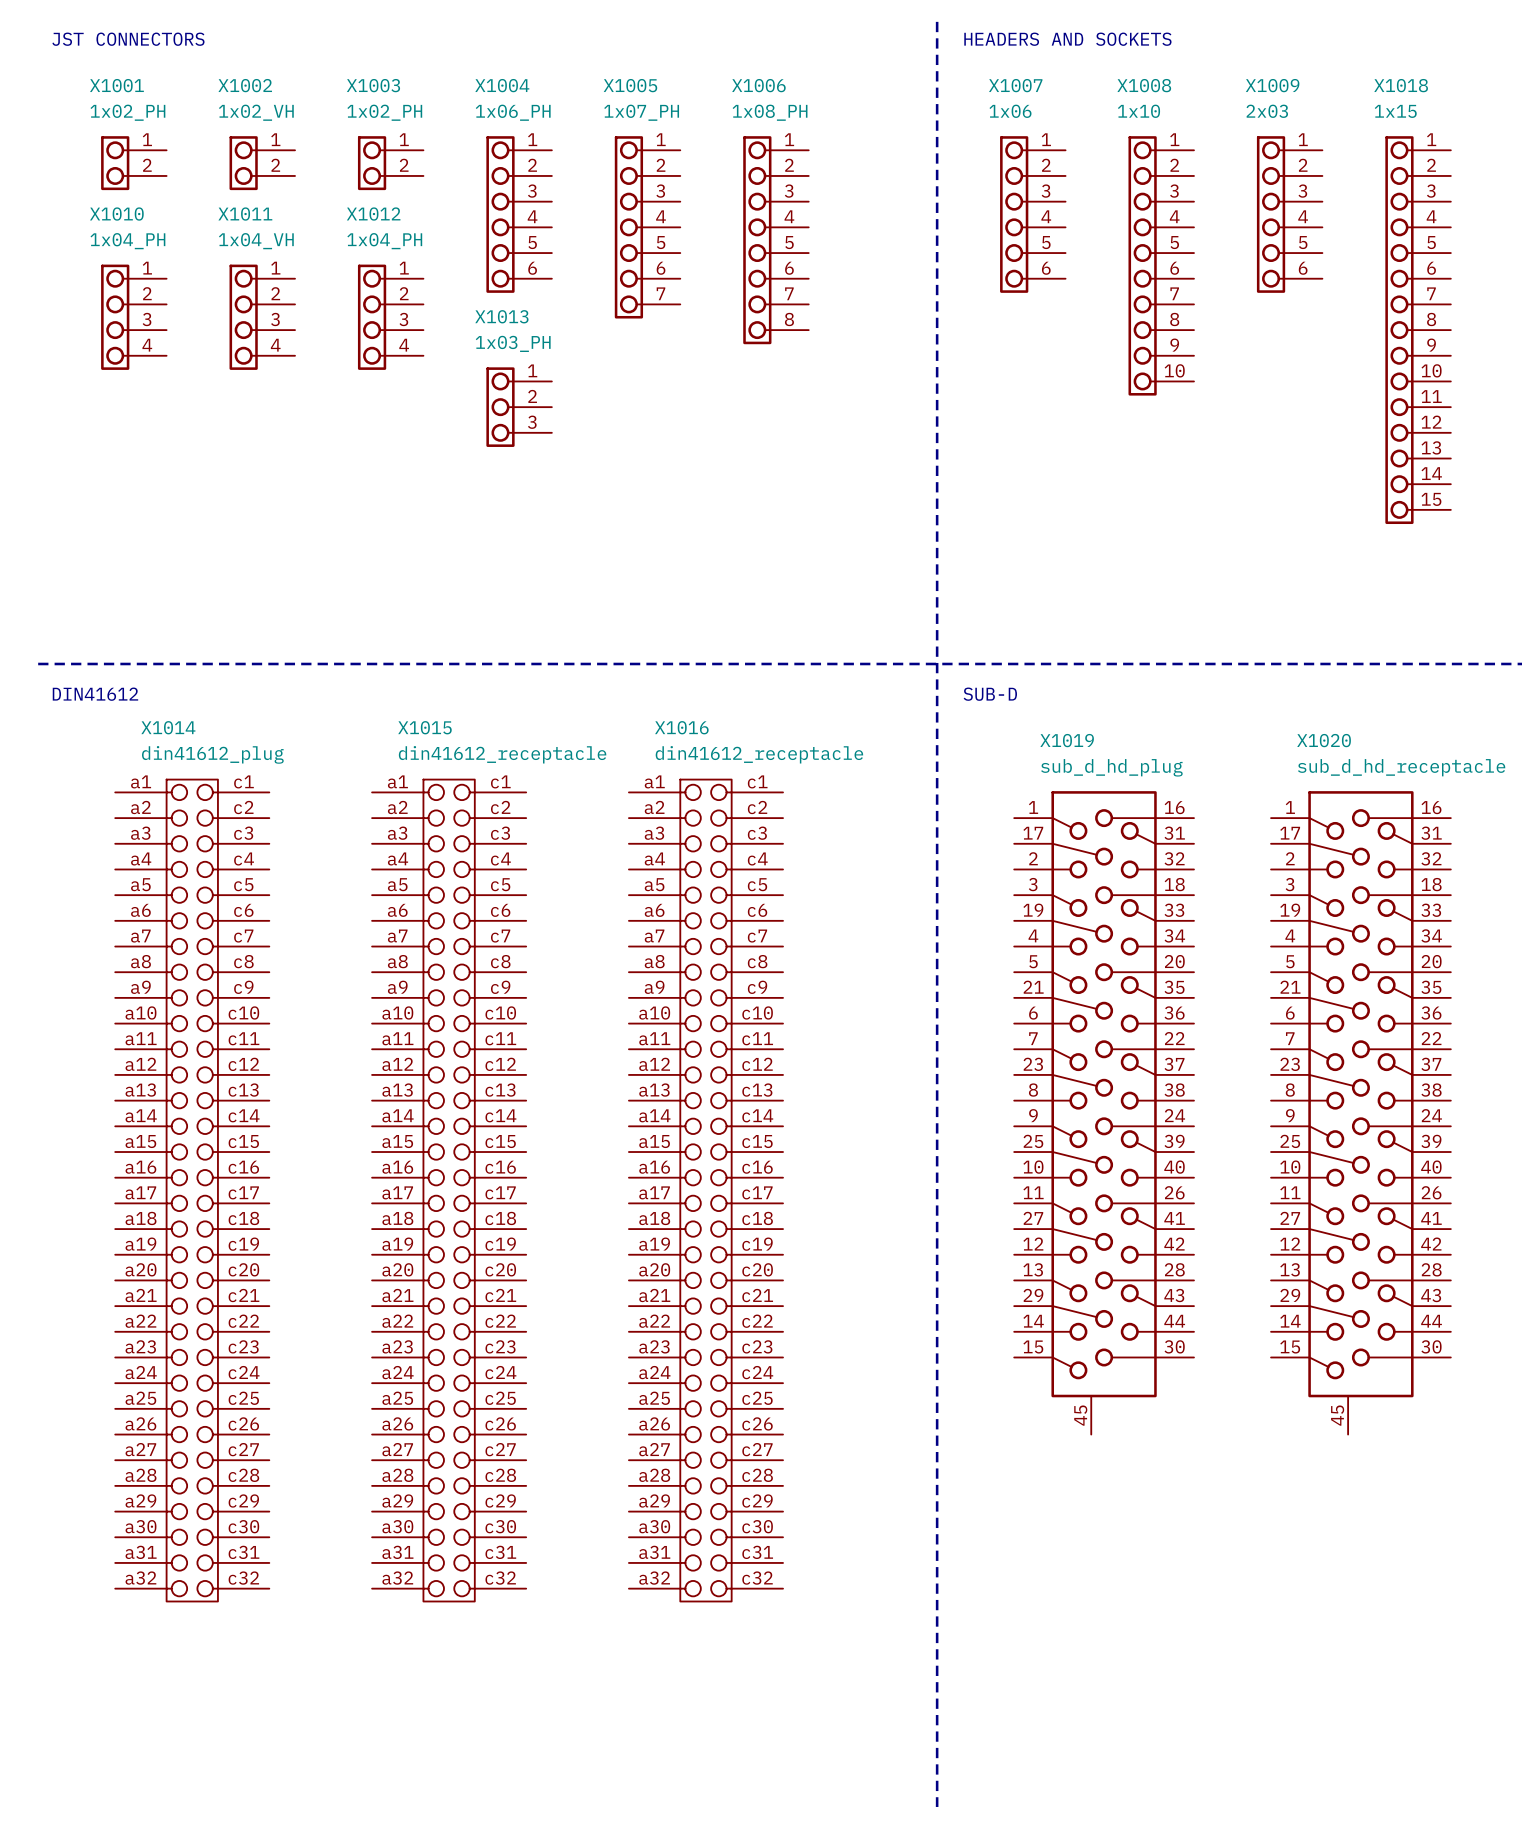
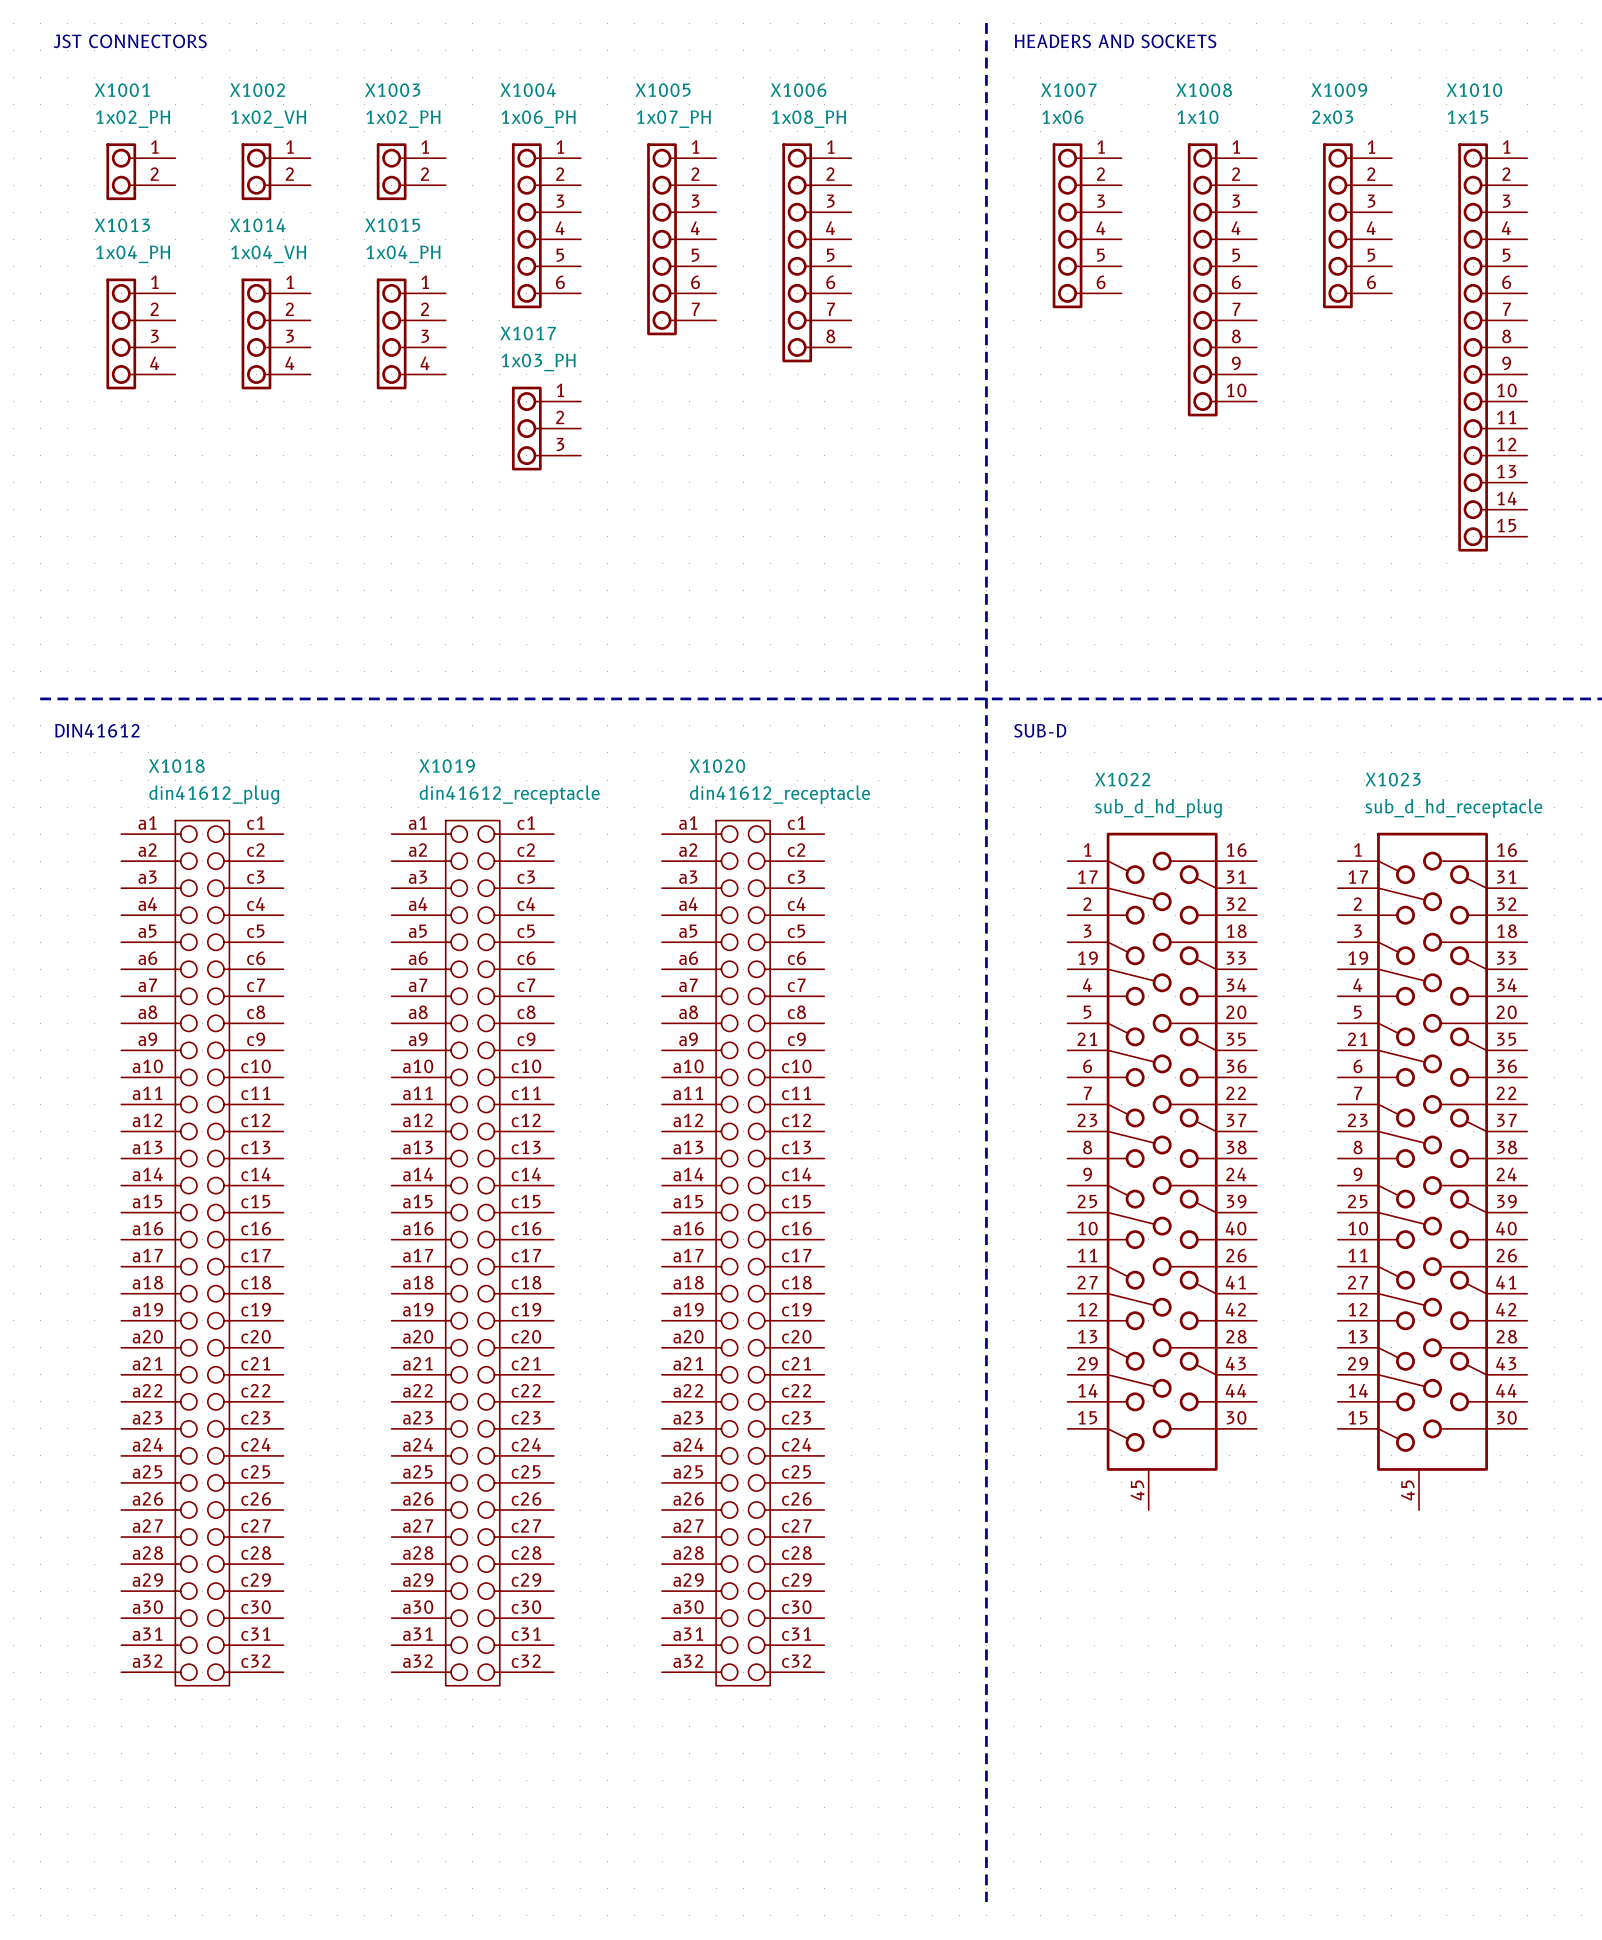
X1018 name: X1018 (1401, 85) -> X1010 (1474, 90)
X1010 name: X1010 (116, 214) -> X1013 (122, 225)
X1011 name: X1011 (245, 214) -> X1014 (257, 225)
X1012 name: X1012 (373, 214) -> X1015 (392, 225)
X1013 name: X1013 (501, 316) -> X1017 (528, 333)
X1014 name: X1014 (168, 727) -> X1018 (176, 766)
X1015 name: X1015 (424, 727) -> X1019 (447, 766)
X1016 name: X1016 (681, 727) -> X1020 (717, 766)
X1019 name: X1019 (1067, 740) -> X1022 (1122, 779)
X1020 name: X1020 (1324, 740) -> X1023 (1393, 779)

